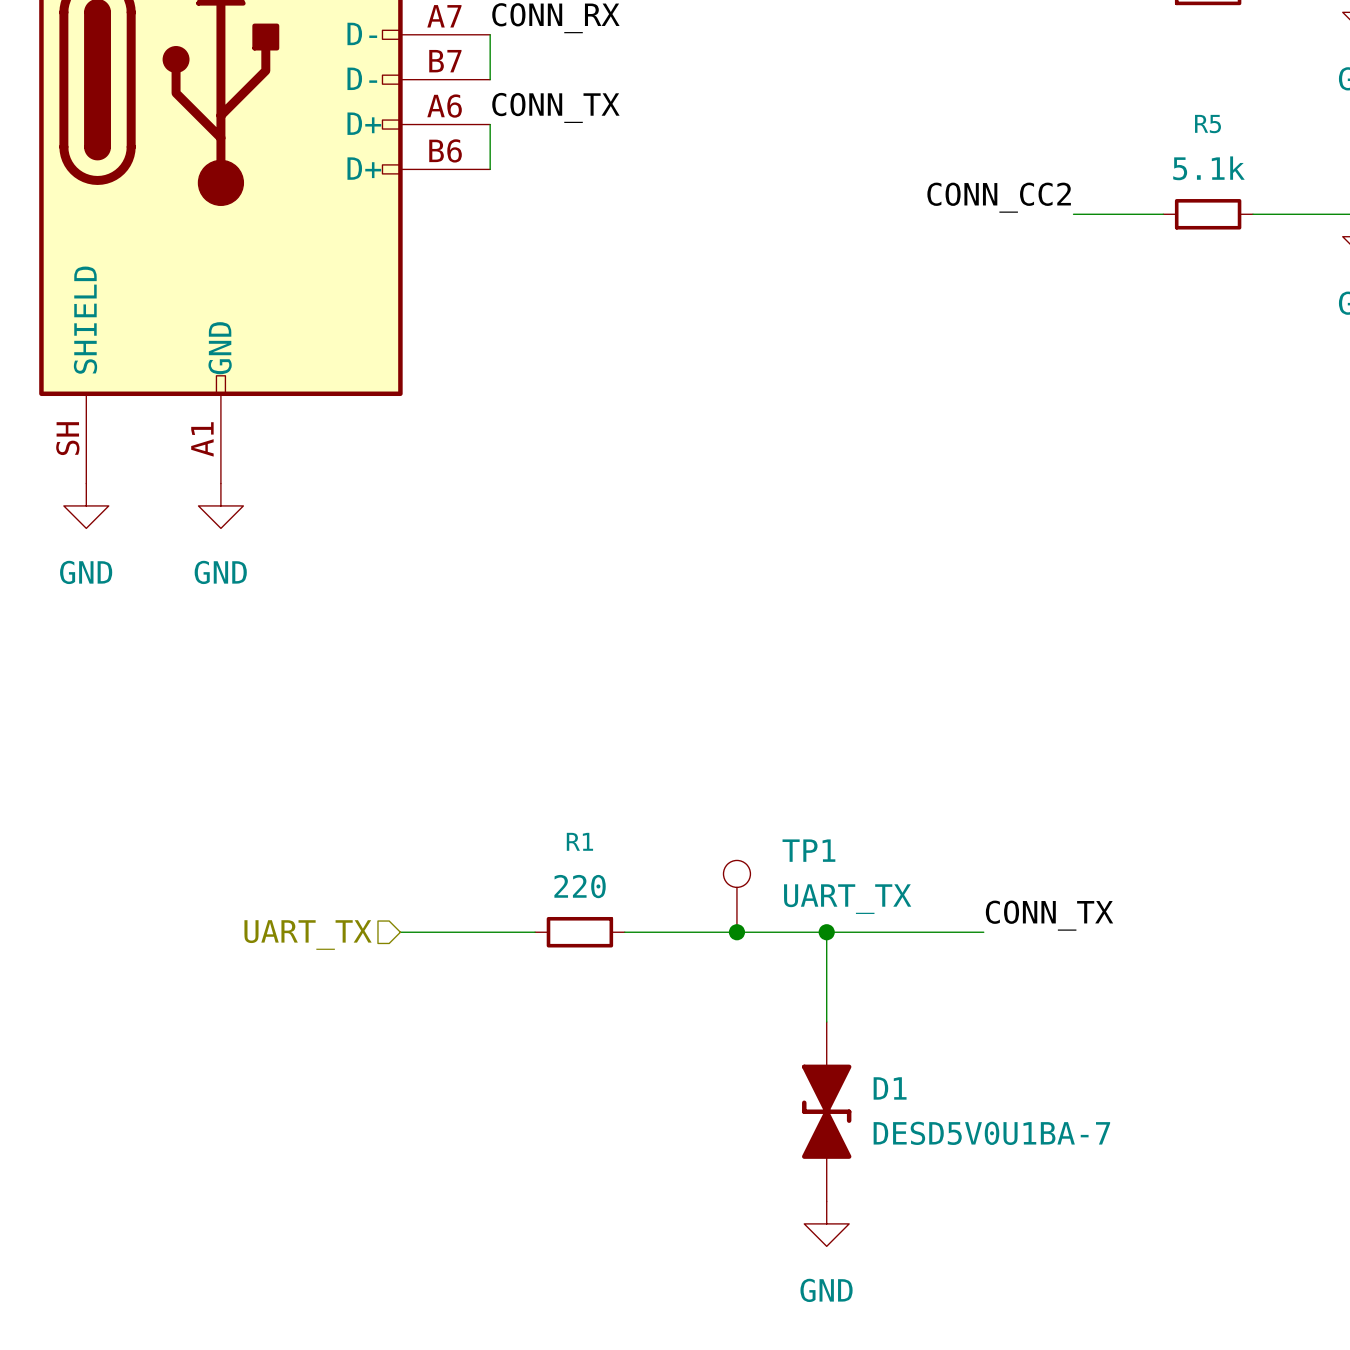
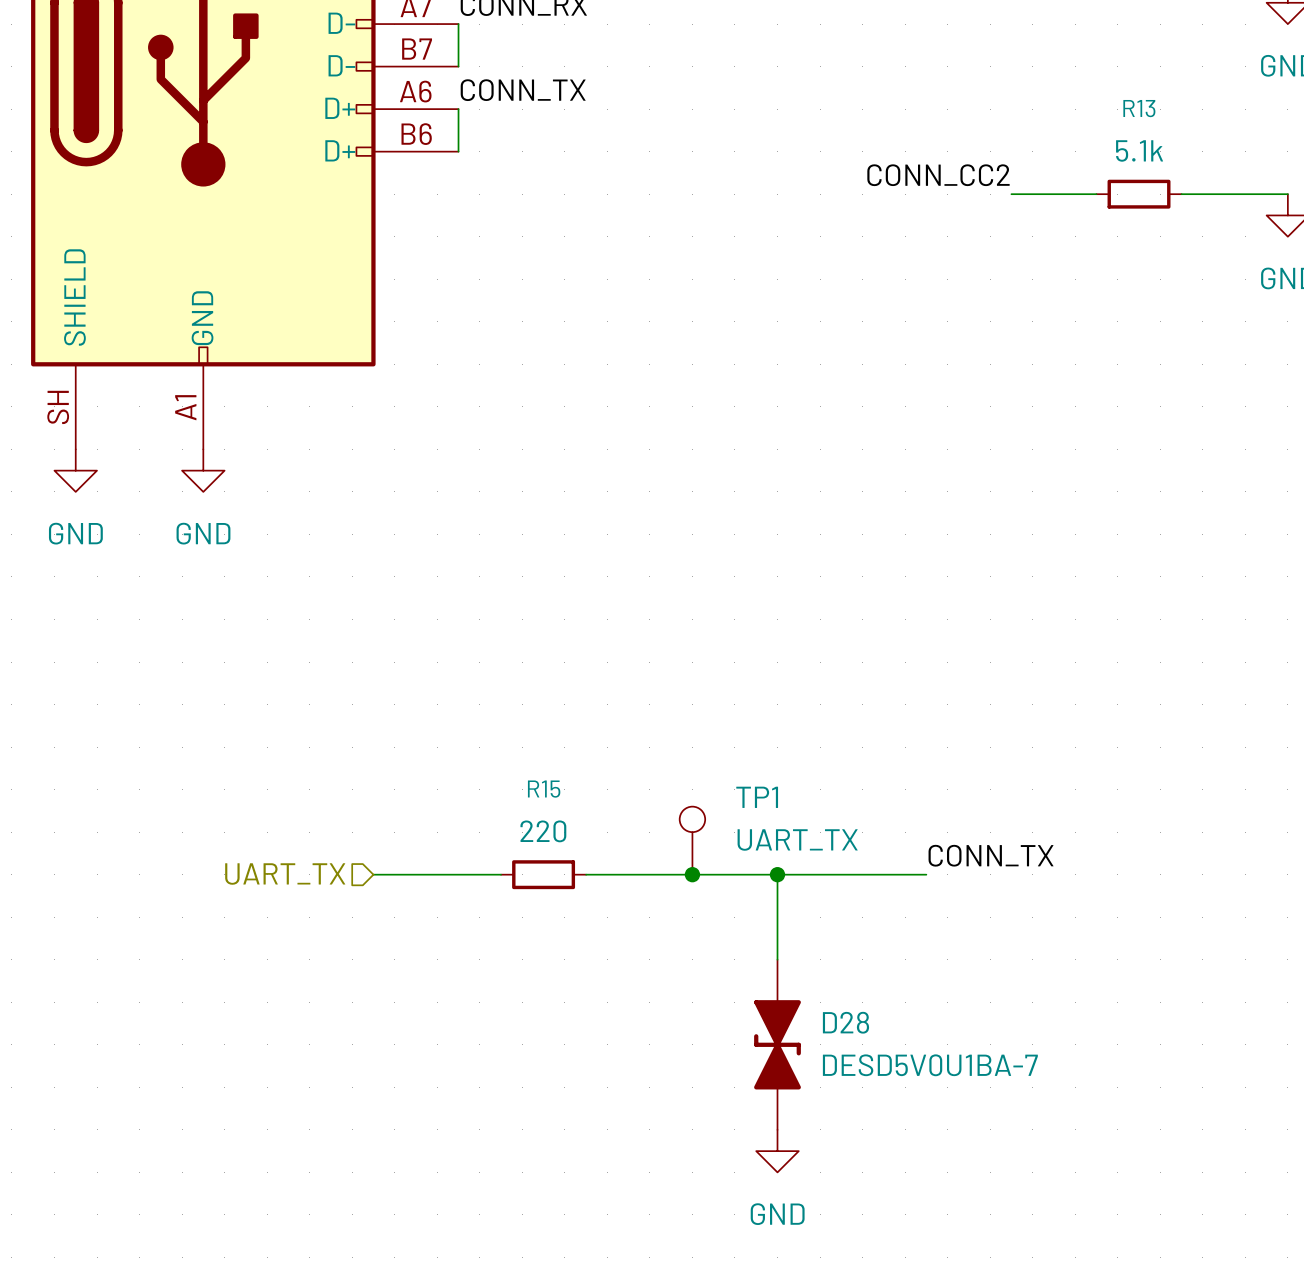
R5 name: R5 (1208, 124) -> R13 (1139, 108)
R1 name: R1 (579, 841) -> R15 (544, 789)
D1 name: D1 (890, 1088) -> D28 (845, 1022)

